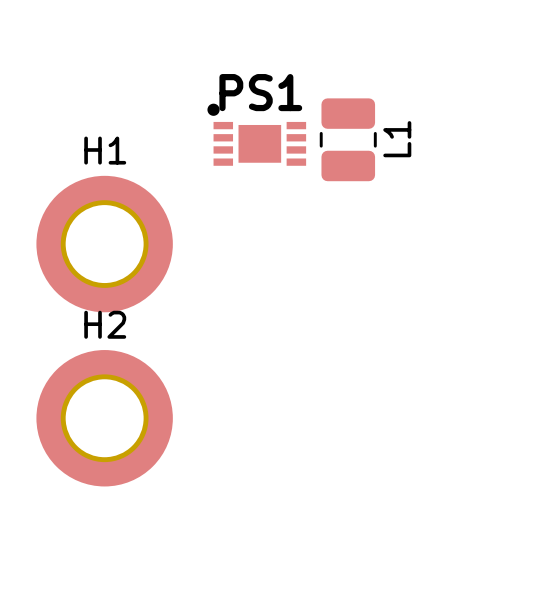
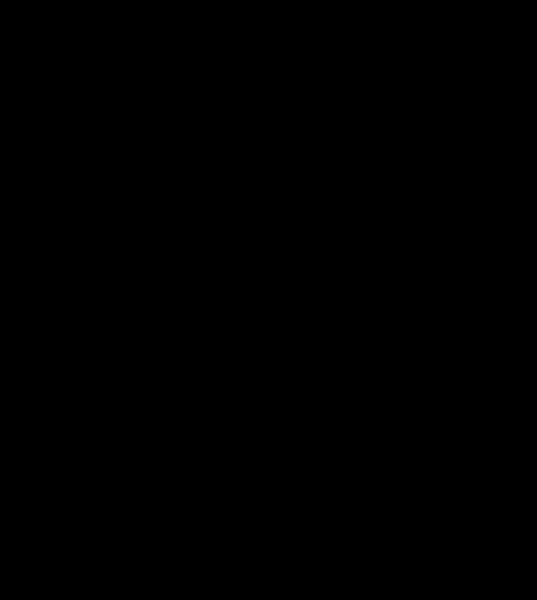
PS1: (256, 134) -> none
L1: (348, 139) -> none
H1: (104, 244) -> none
H2: (104, 418) -> none

